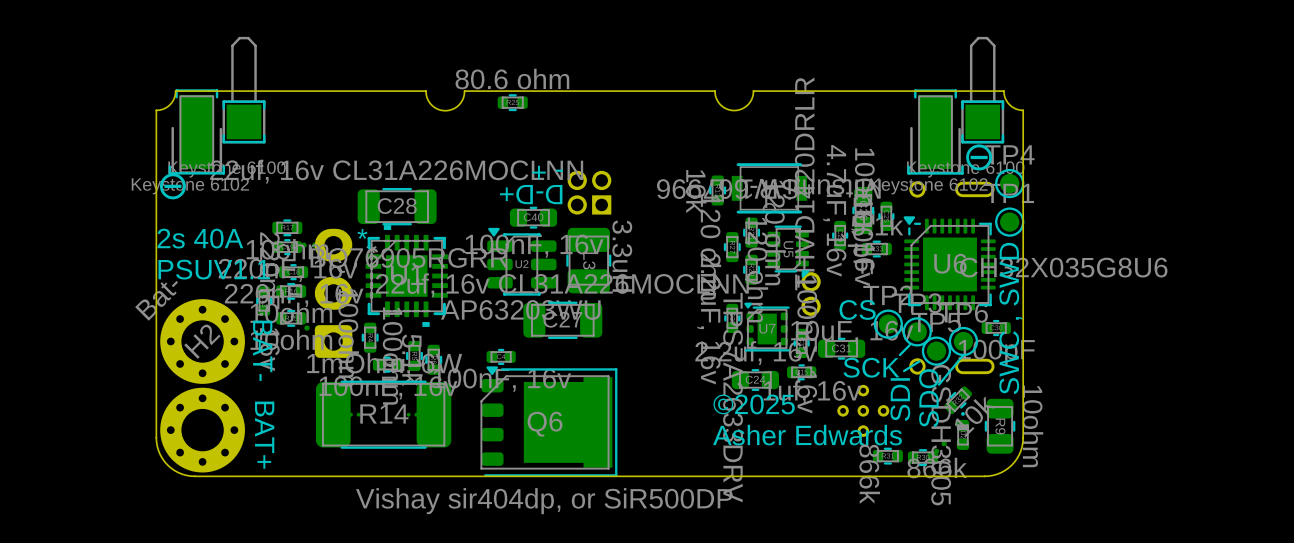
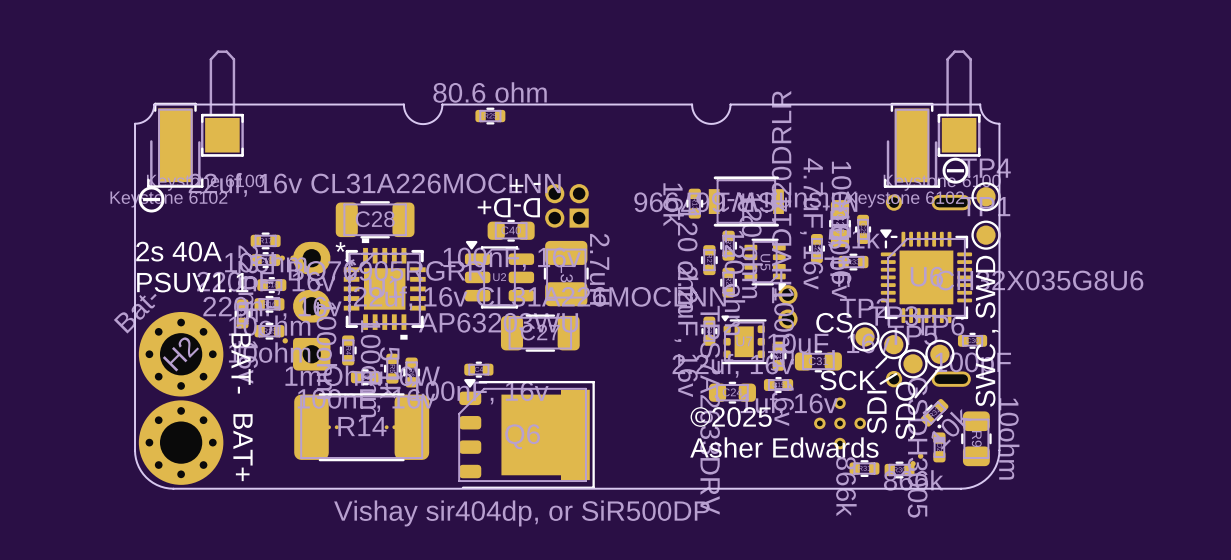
L3 value: 3.3uH (622, 256) -> 2.7uH (599, 269)

